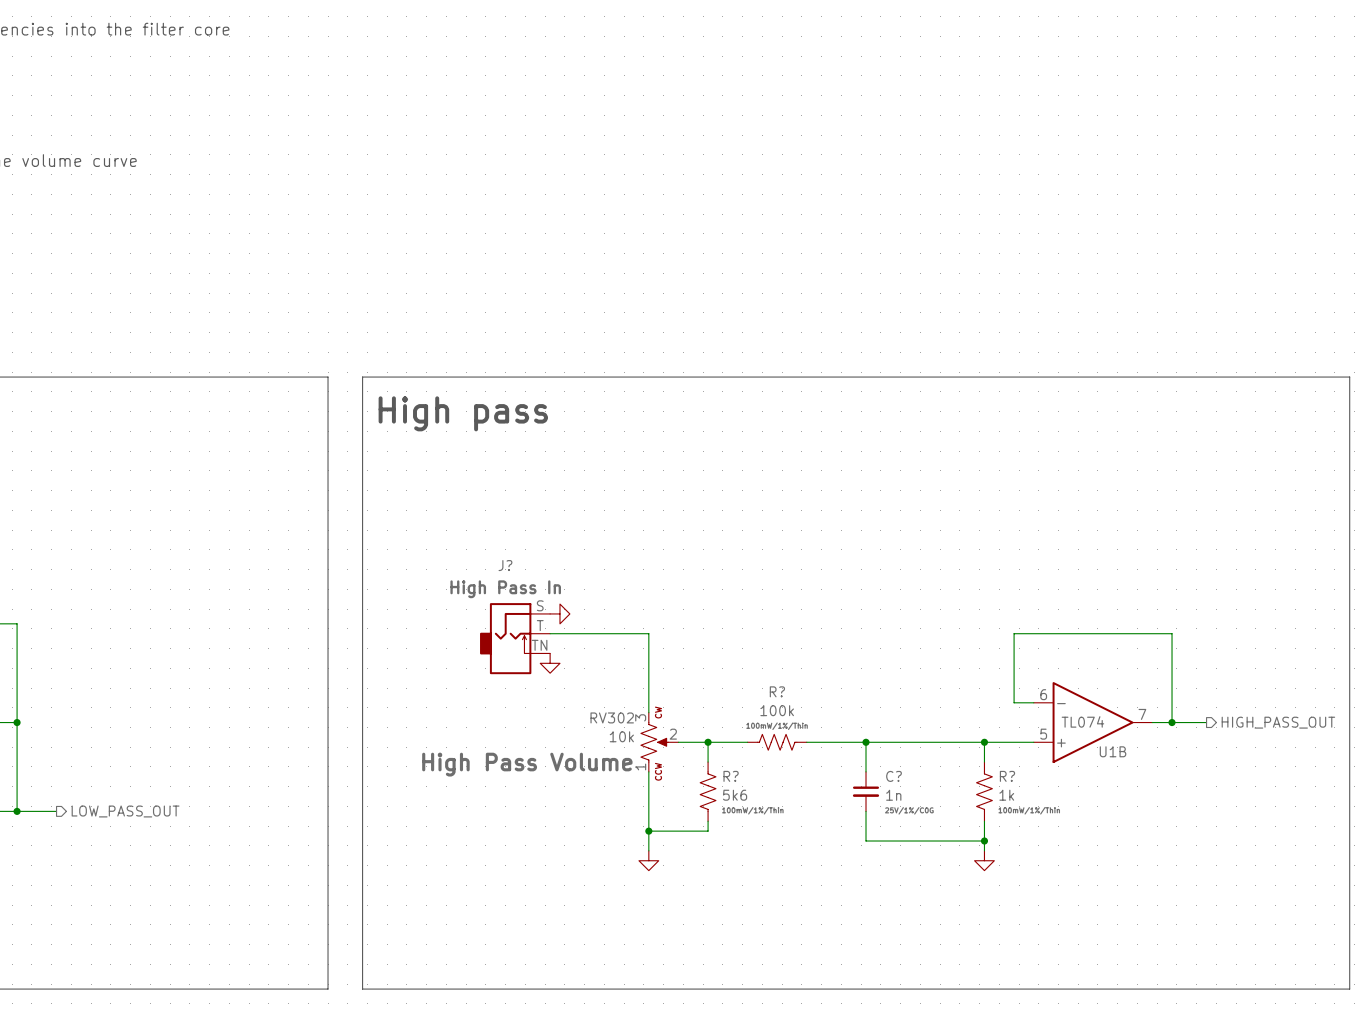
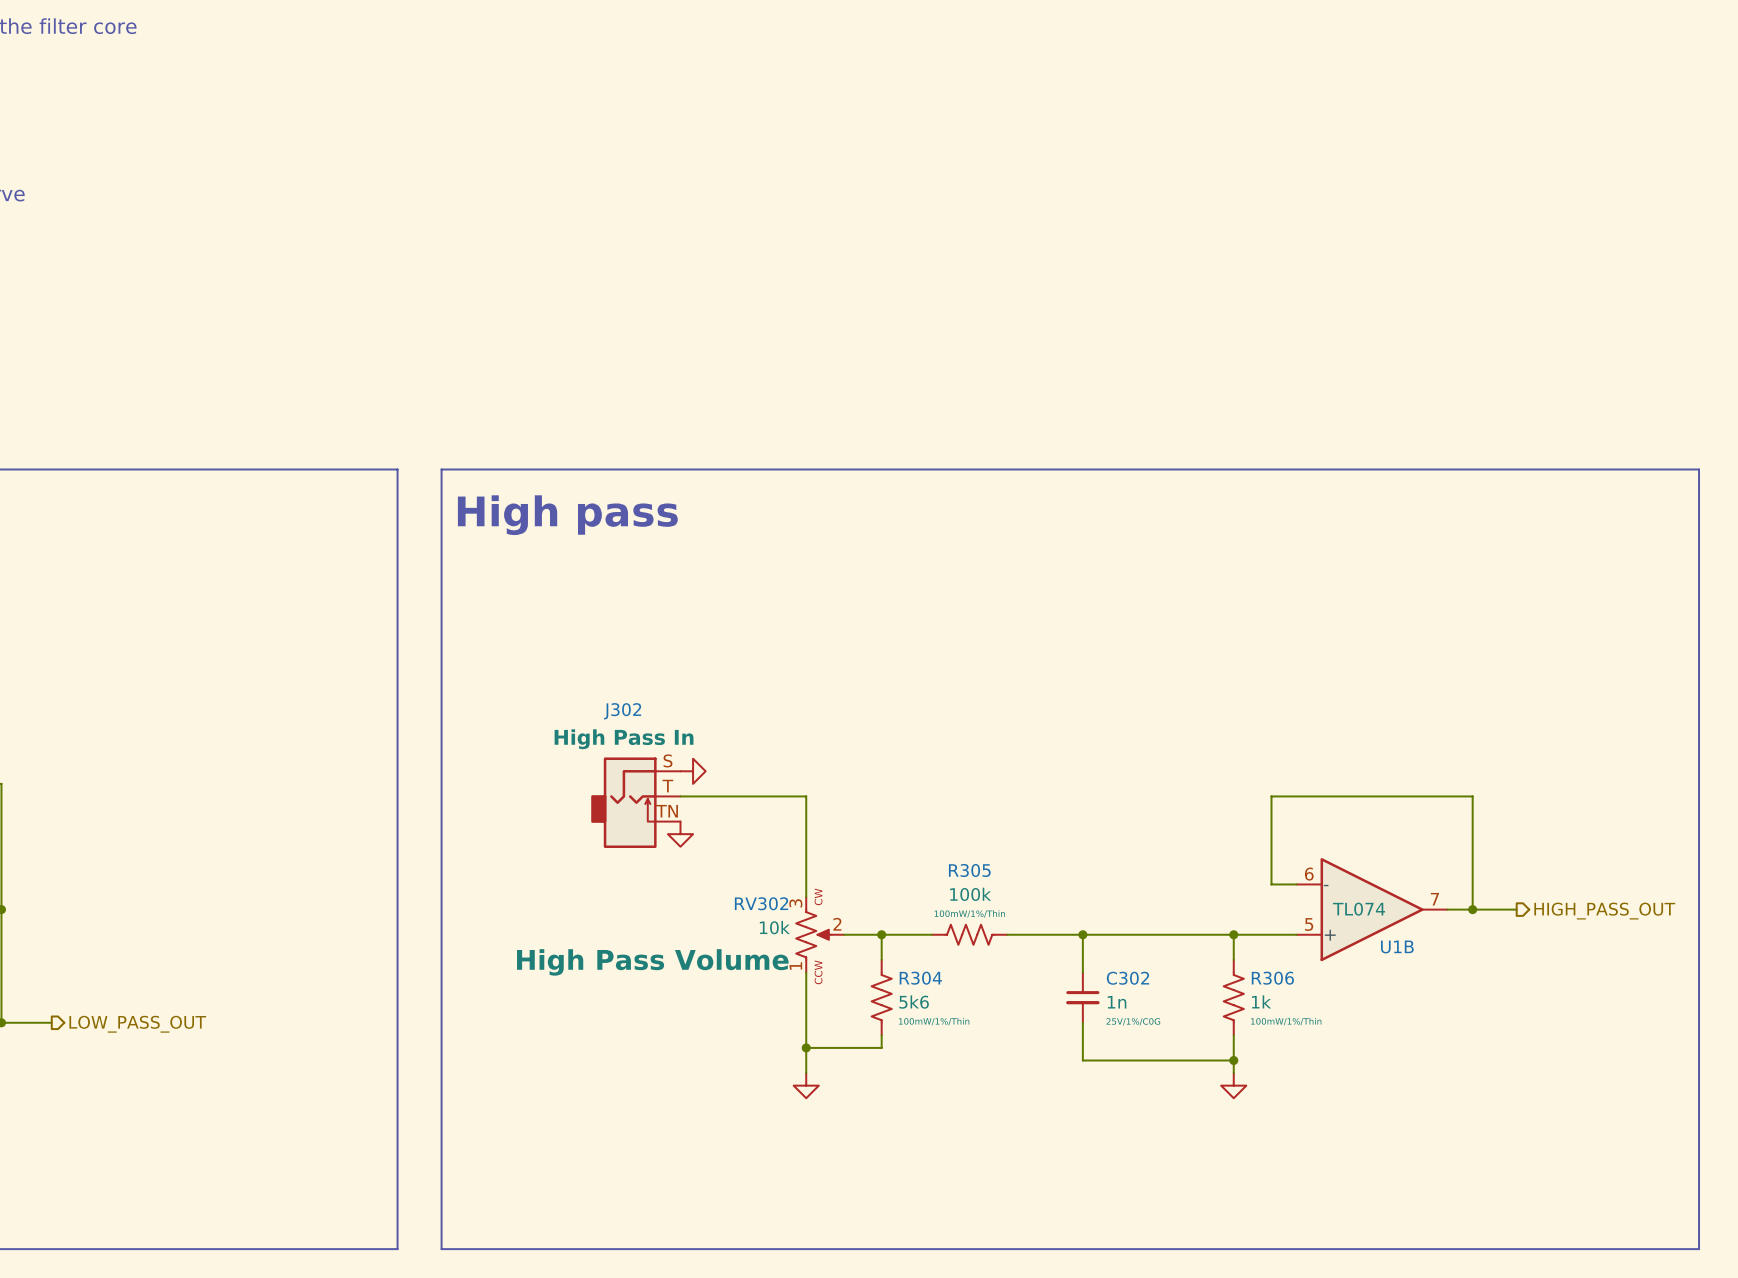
J? name: J? (505, 565) -> J302 (622, 711)
R? name: R? (777, 691) -> R305 (969, 870)
R? name: R? (731, 776) -> R304 (920, 978)
C? name: C? (894, 776) -> C302 (1127, 978)
R? name: R? (1007, 776) -> R306 (1272, 978)

